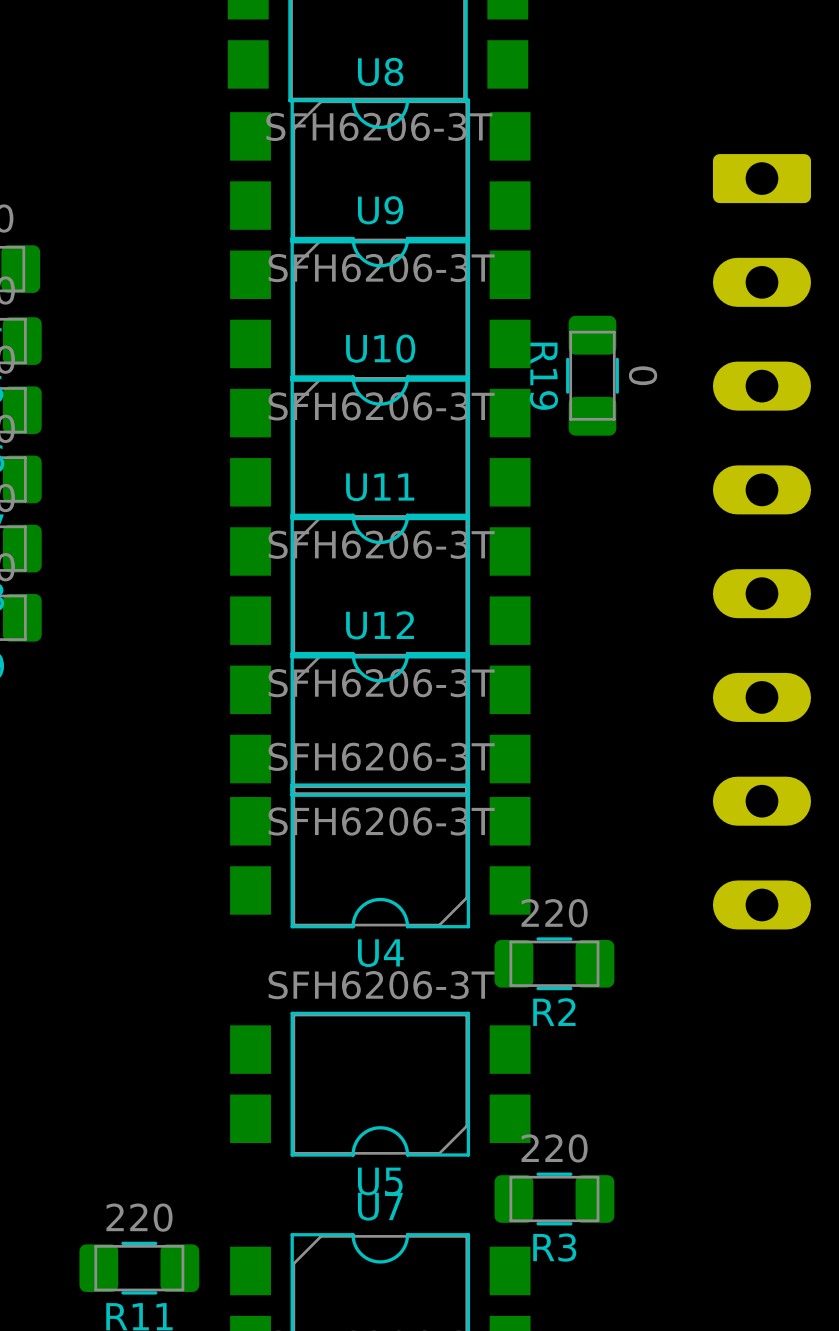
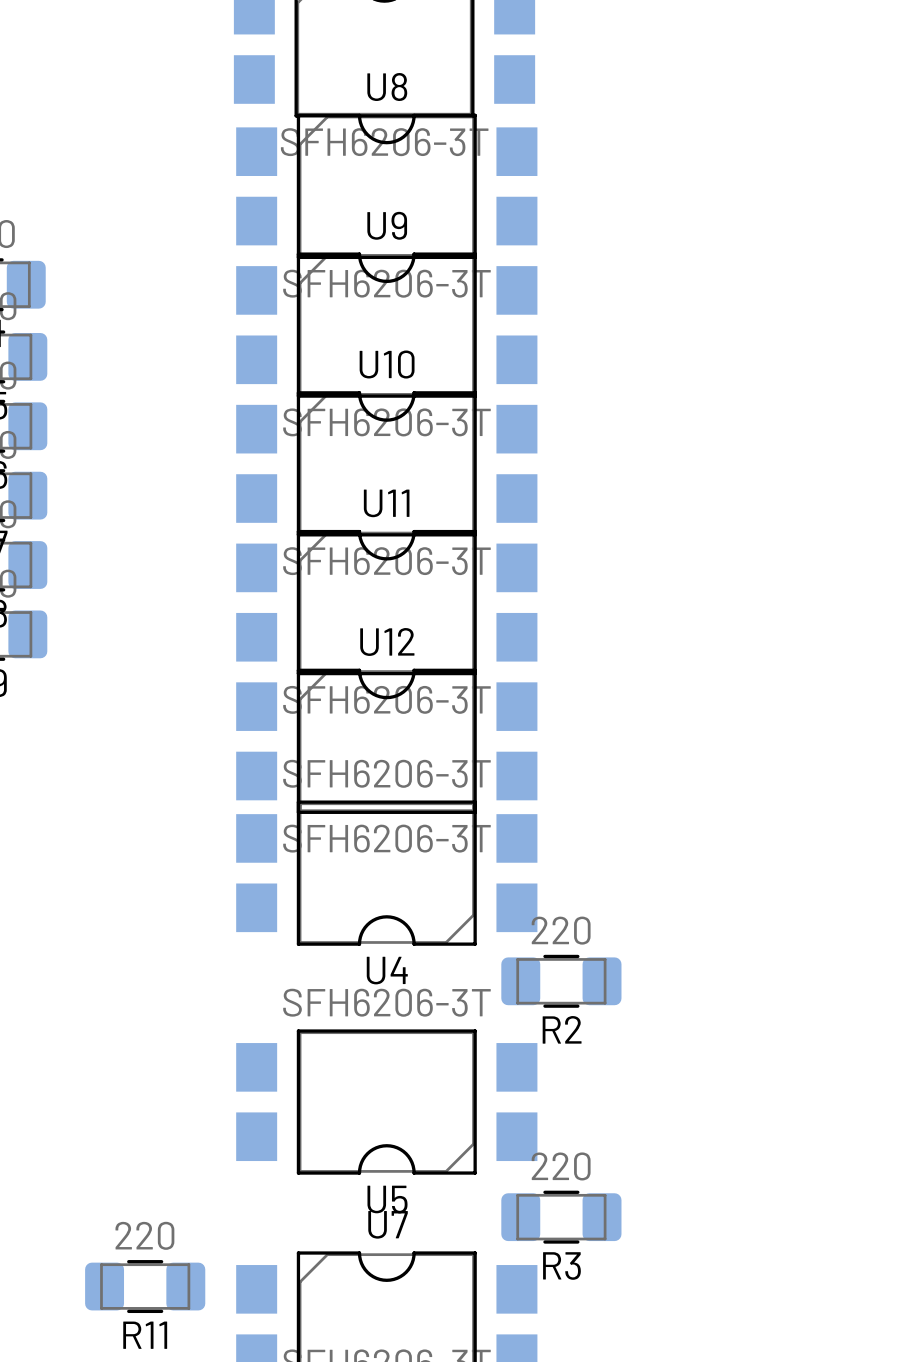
R19: 0 (592, 375) -> none
part: (761, 541) -> none

